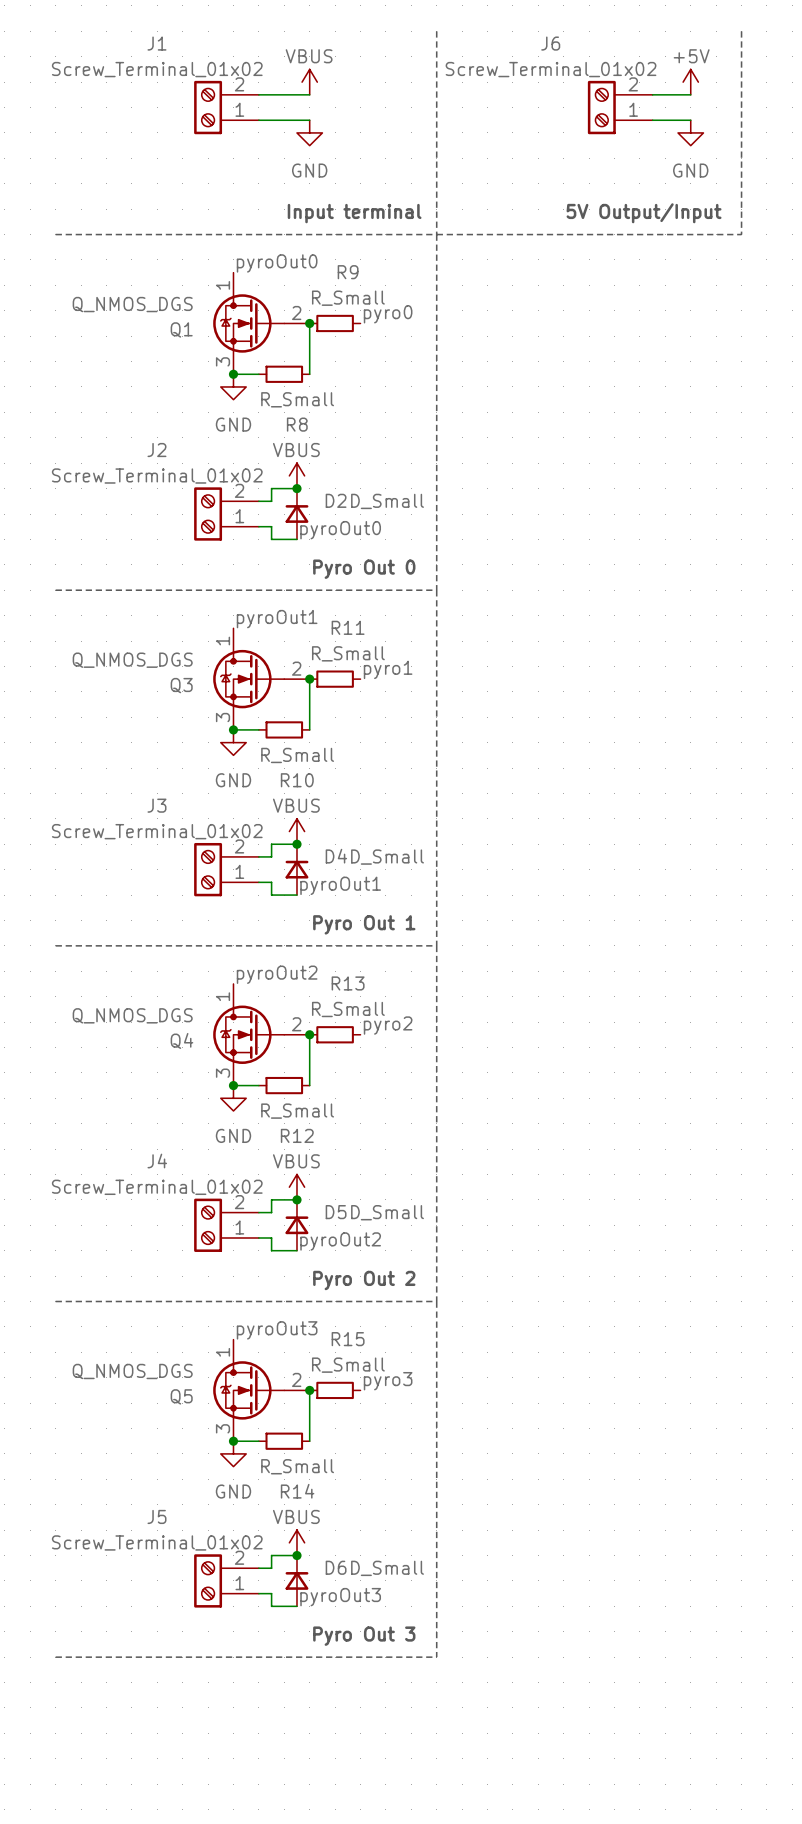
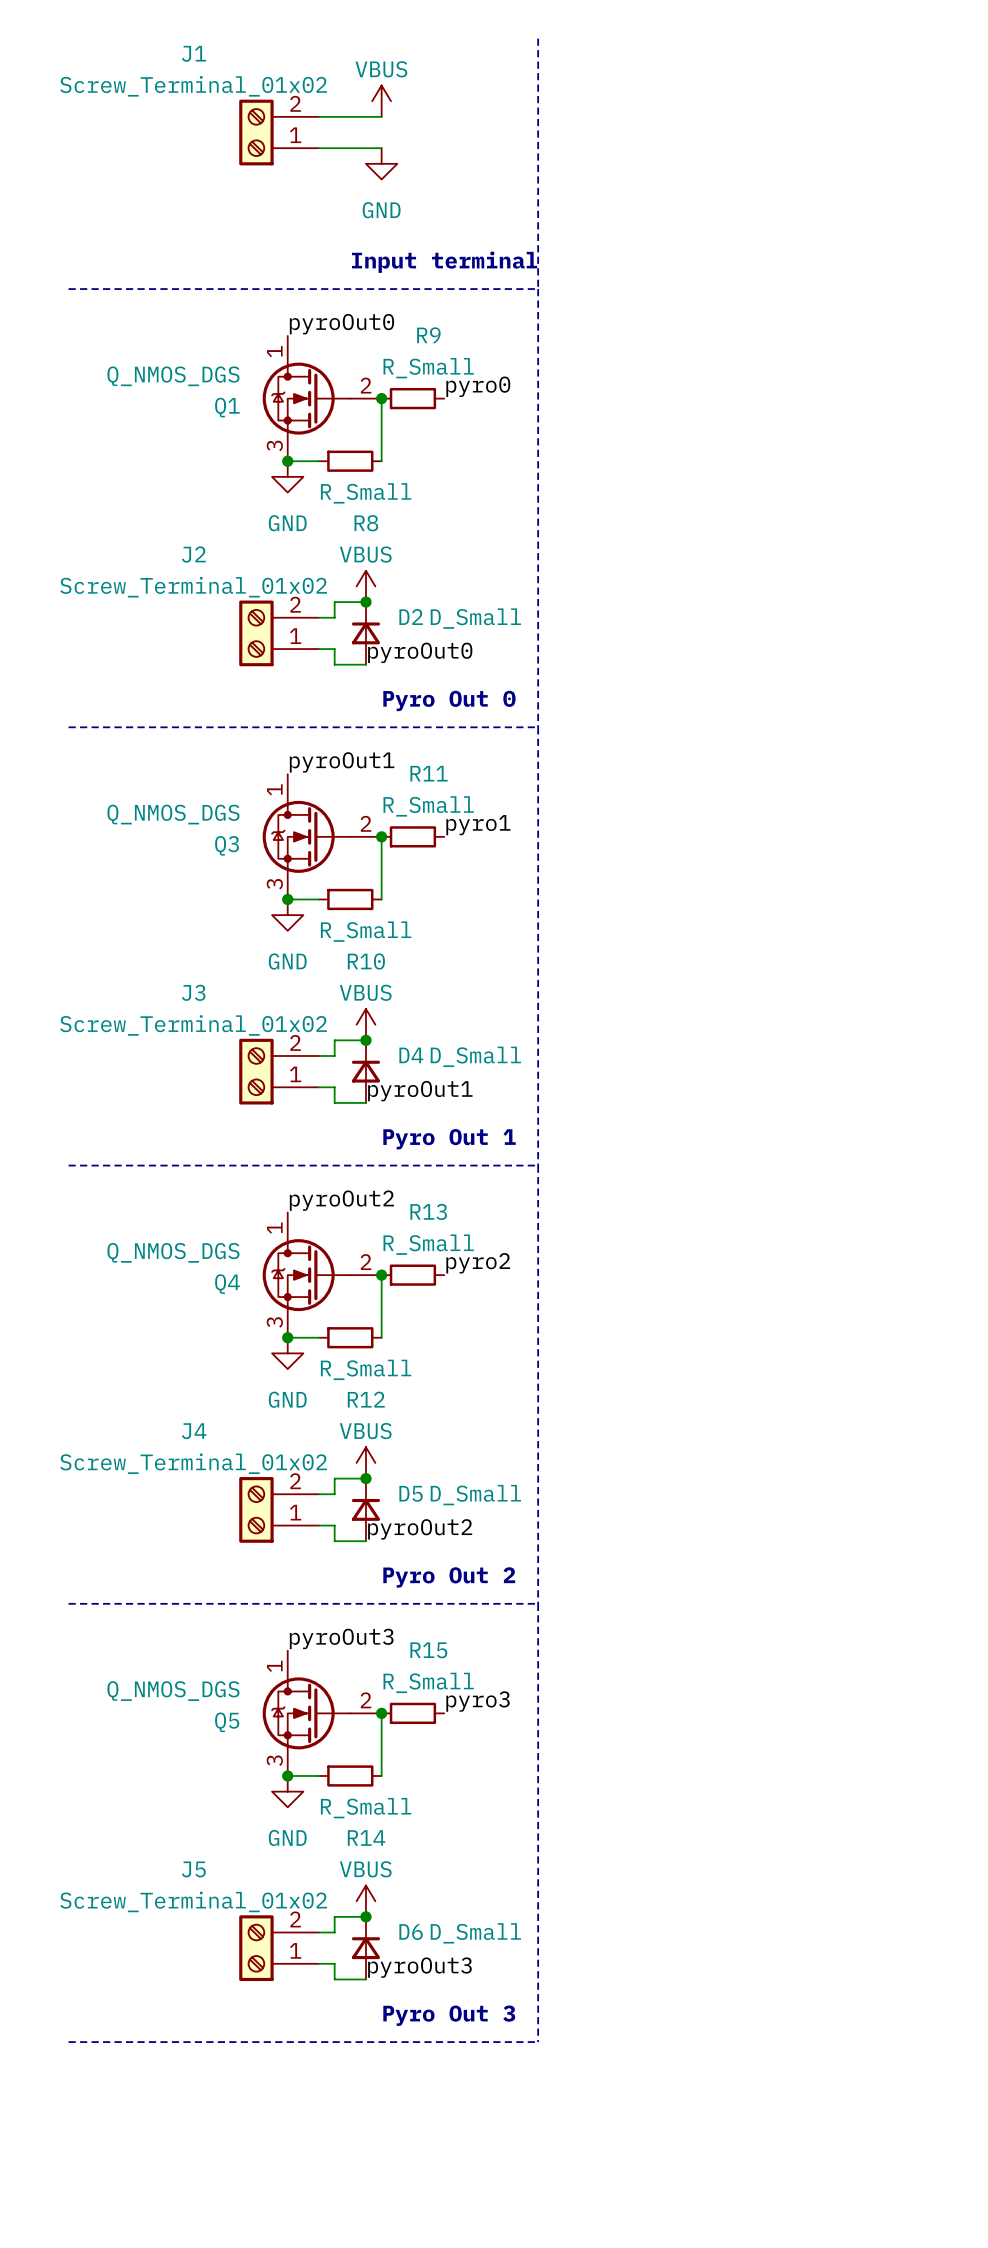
line: (741, 31) (741, 234) (436, 234) -> none
power symbol: +5V (690, 82) -> none
wire: (652, 94) (690, 94) -> none
J6: Screw_Terminal_01x02 (620, 107) -> none
wire: (652, 120) (690, 120) -> none
power symbol: GND (690, 132) -> none
text: 5V Output/Input (644, 213) -> none

